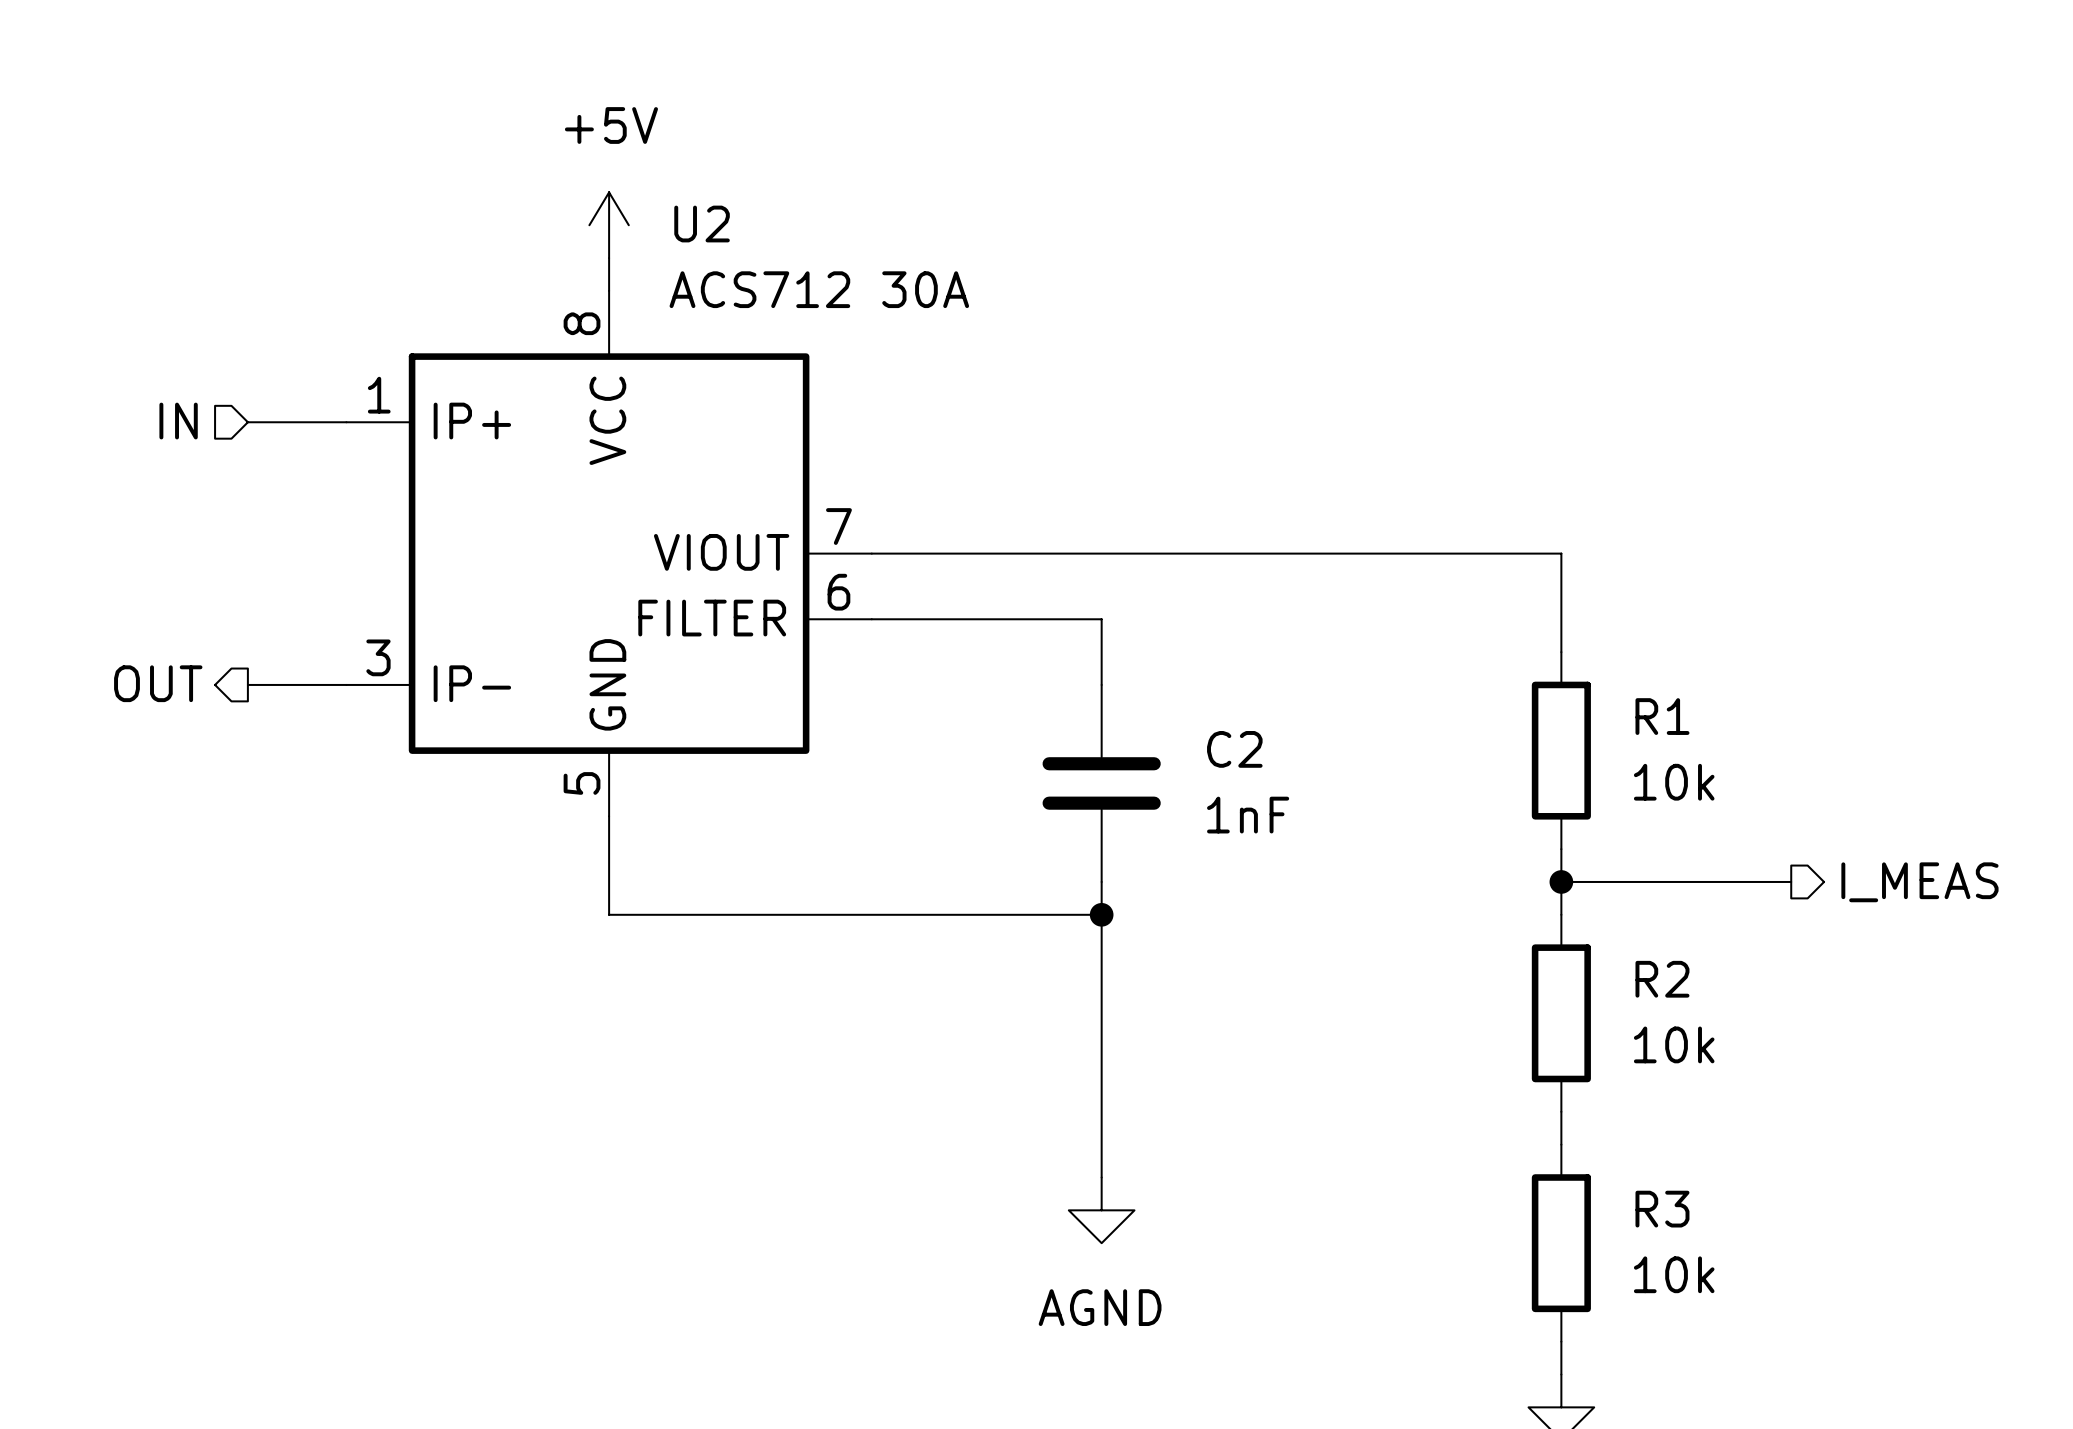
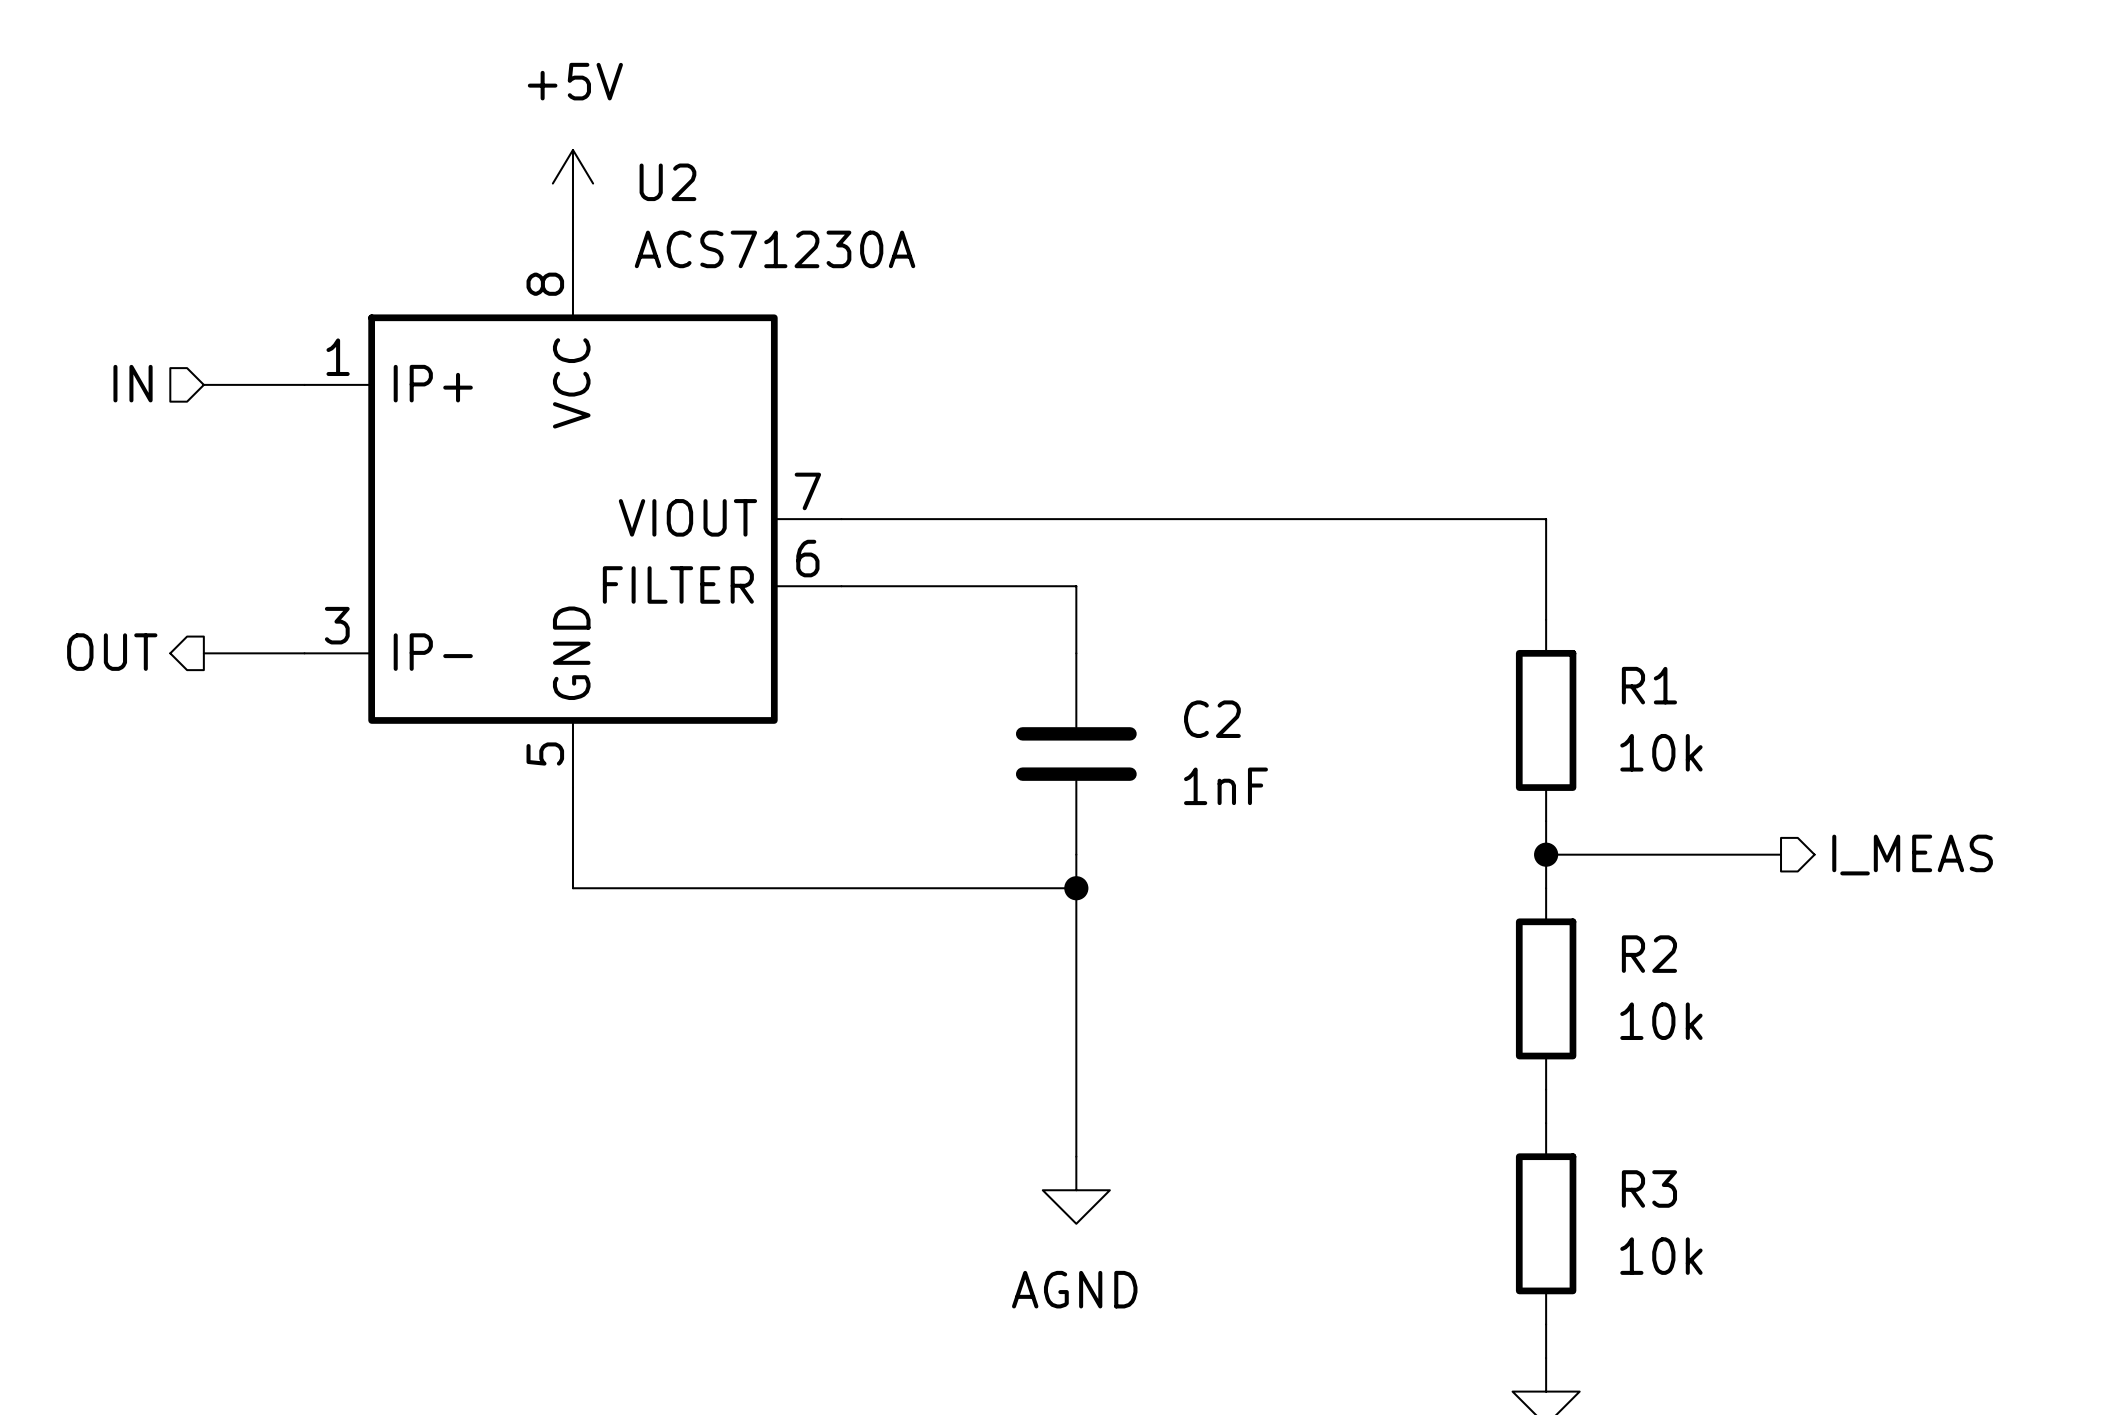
U2 value: ACS712 30A (819, 289) -> ACS71230A (775, 249)

